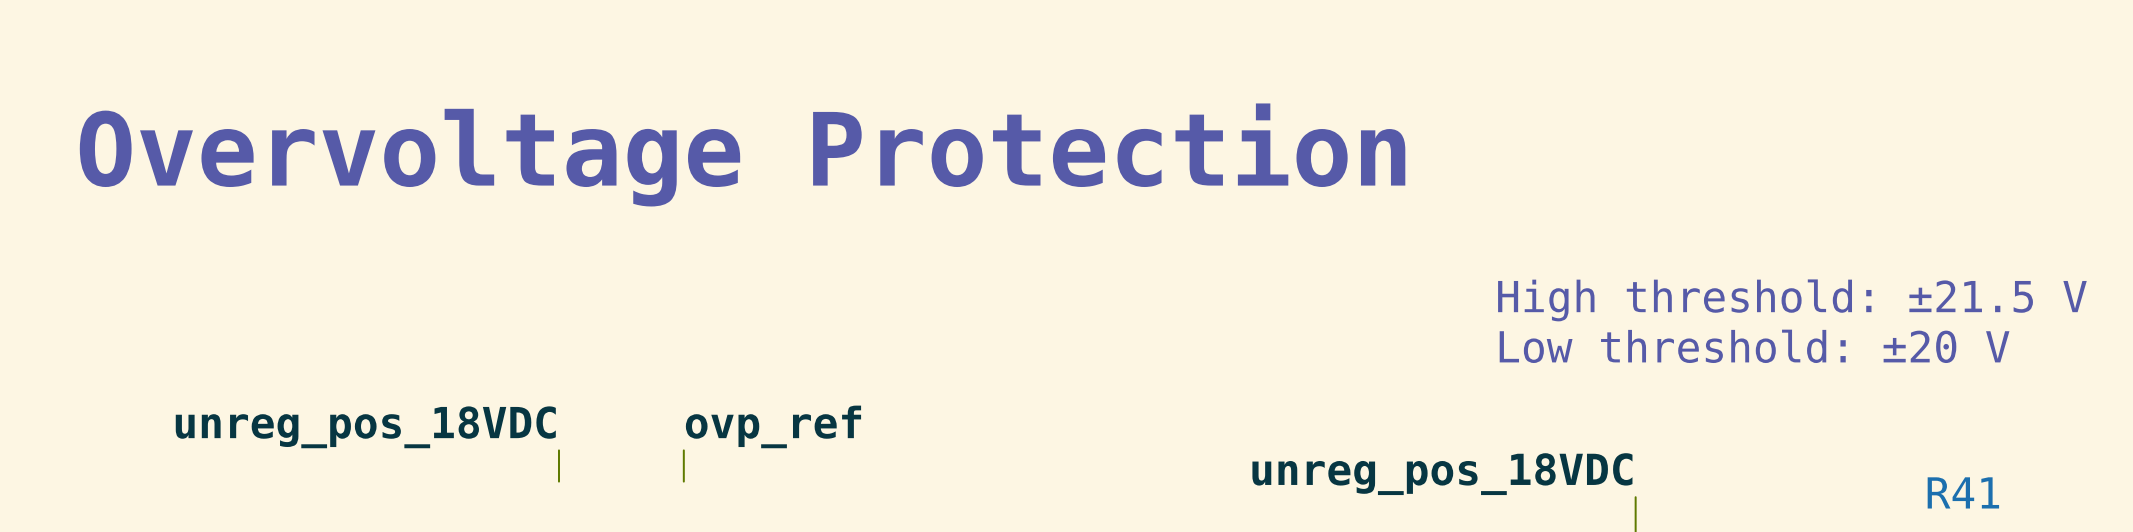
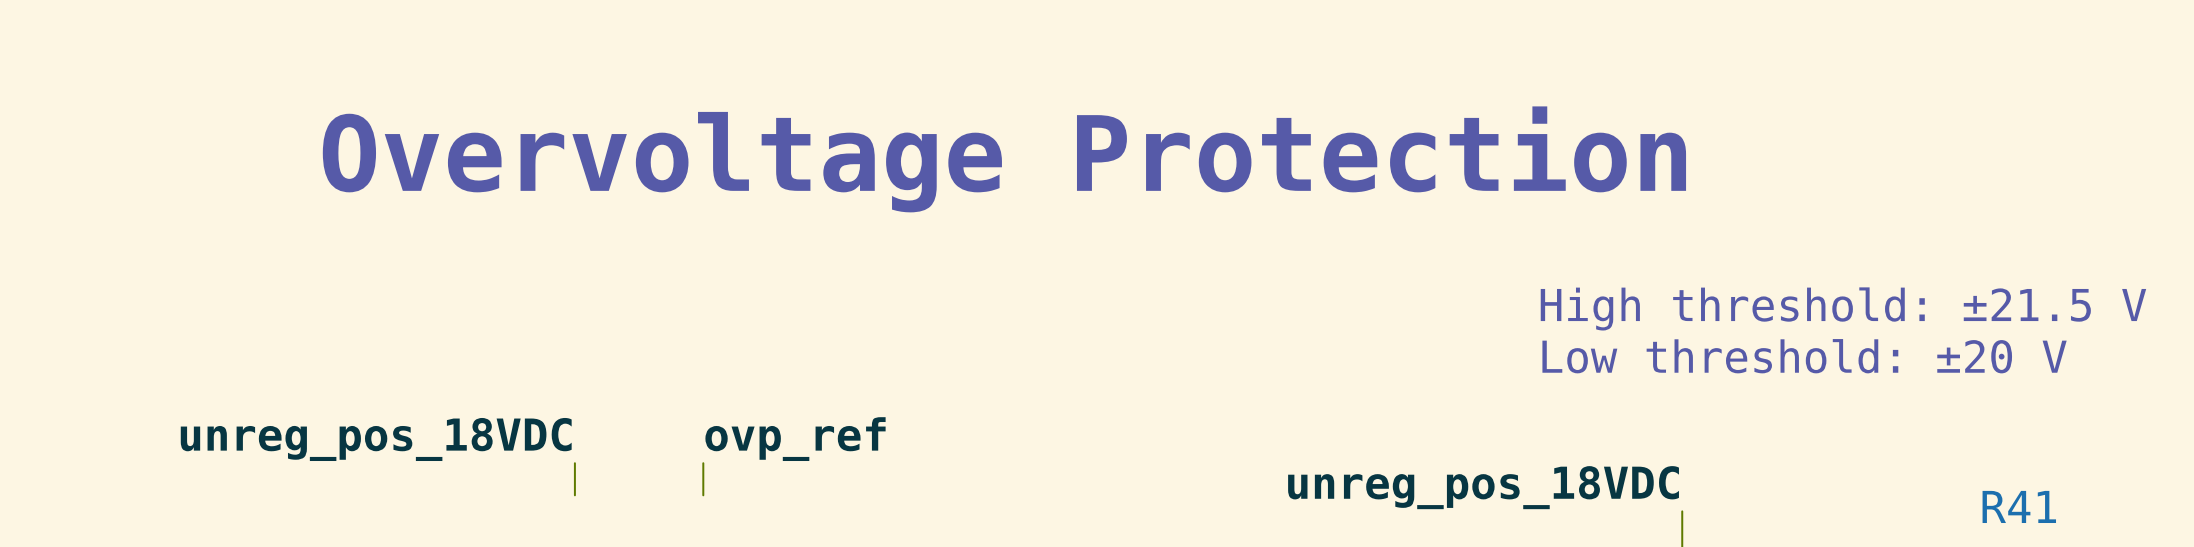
text position: Overvoltage Protection (742, 154) -> Overvoltage Protection (1004, 159)

